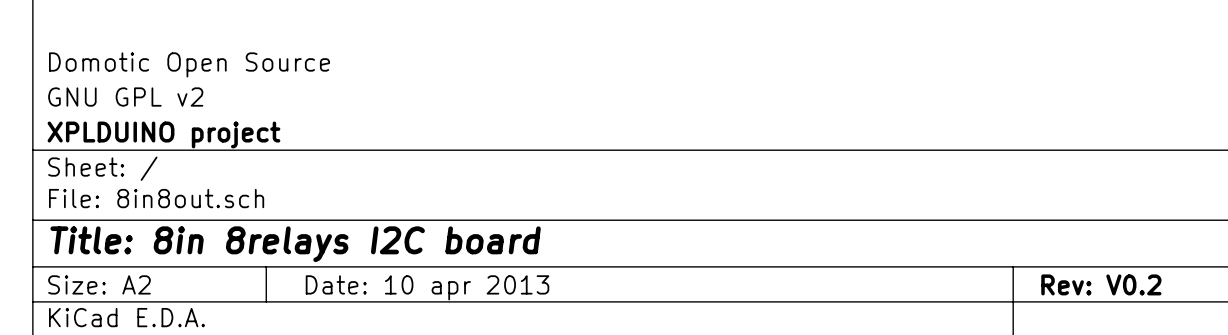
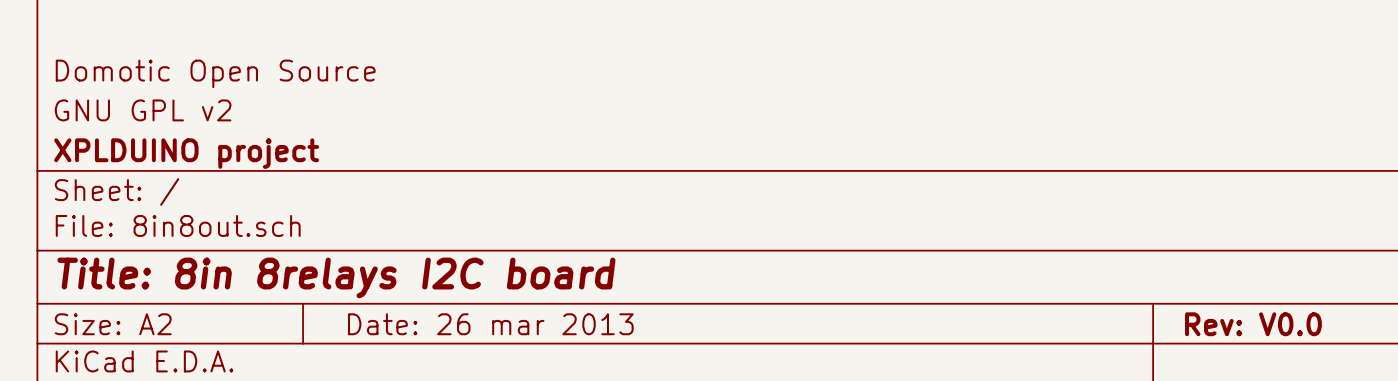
title block: Rev: V0.2 (1101, 284) -> Rev: V0.0 (1253, 324)
title block: Date: 10 apr 2013 (427, 287) -> Date: 26 mar 2013 (490, 324)

